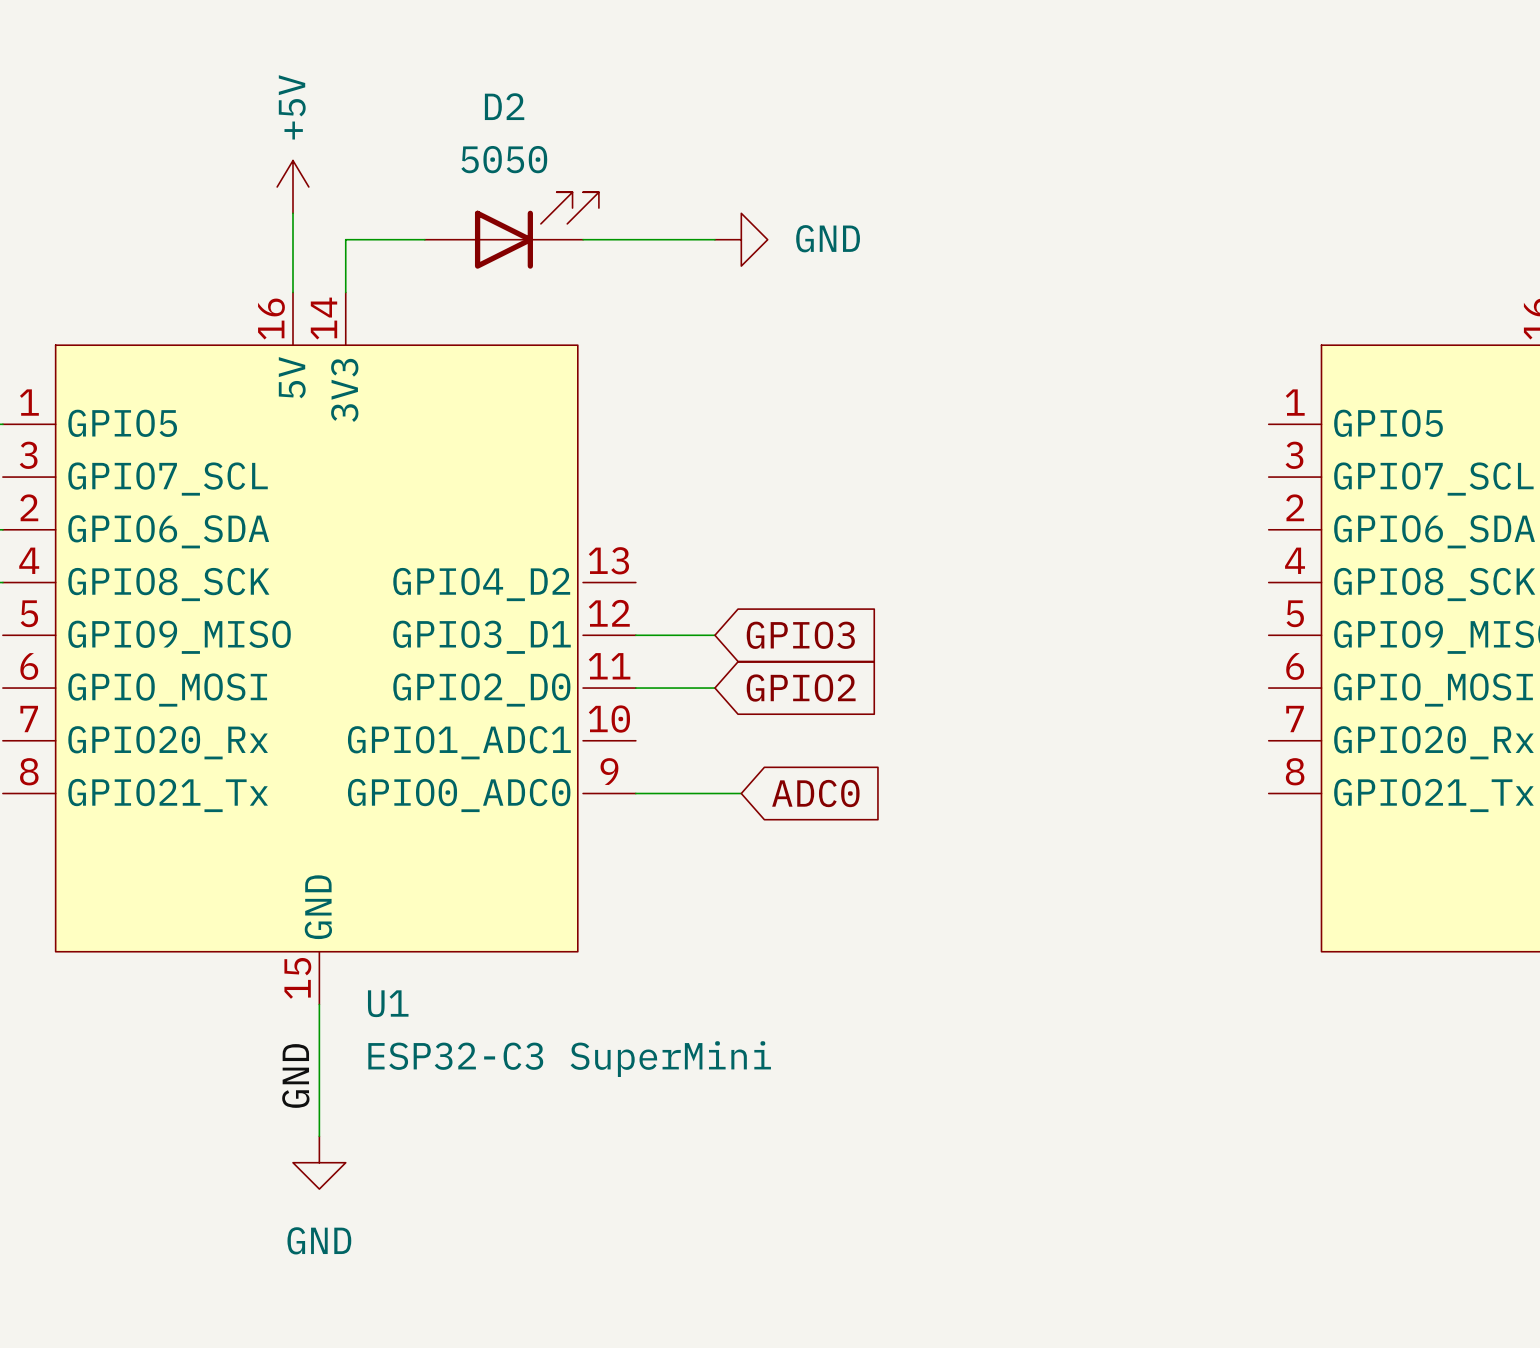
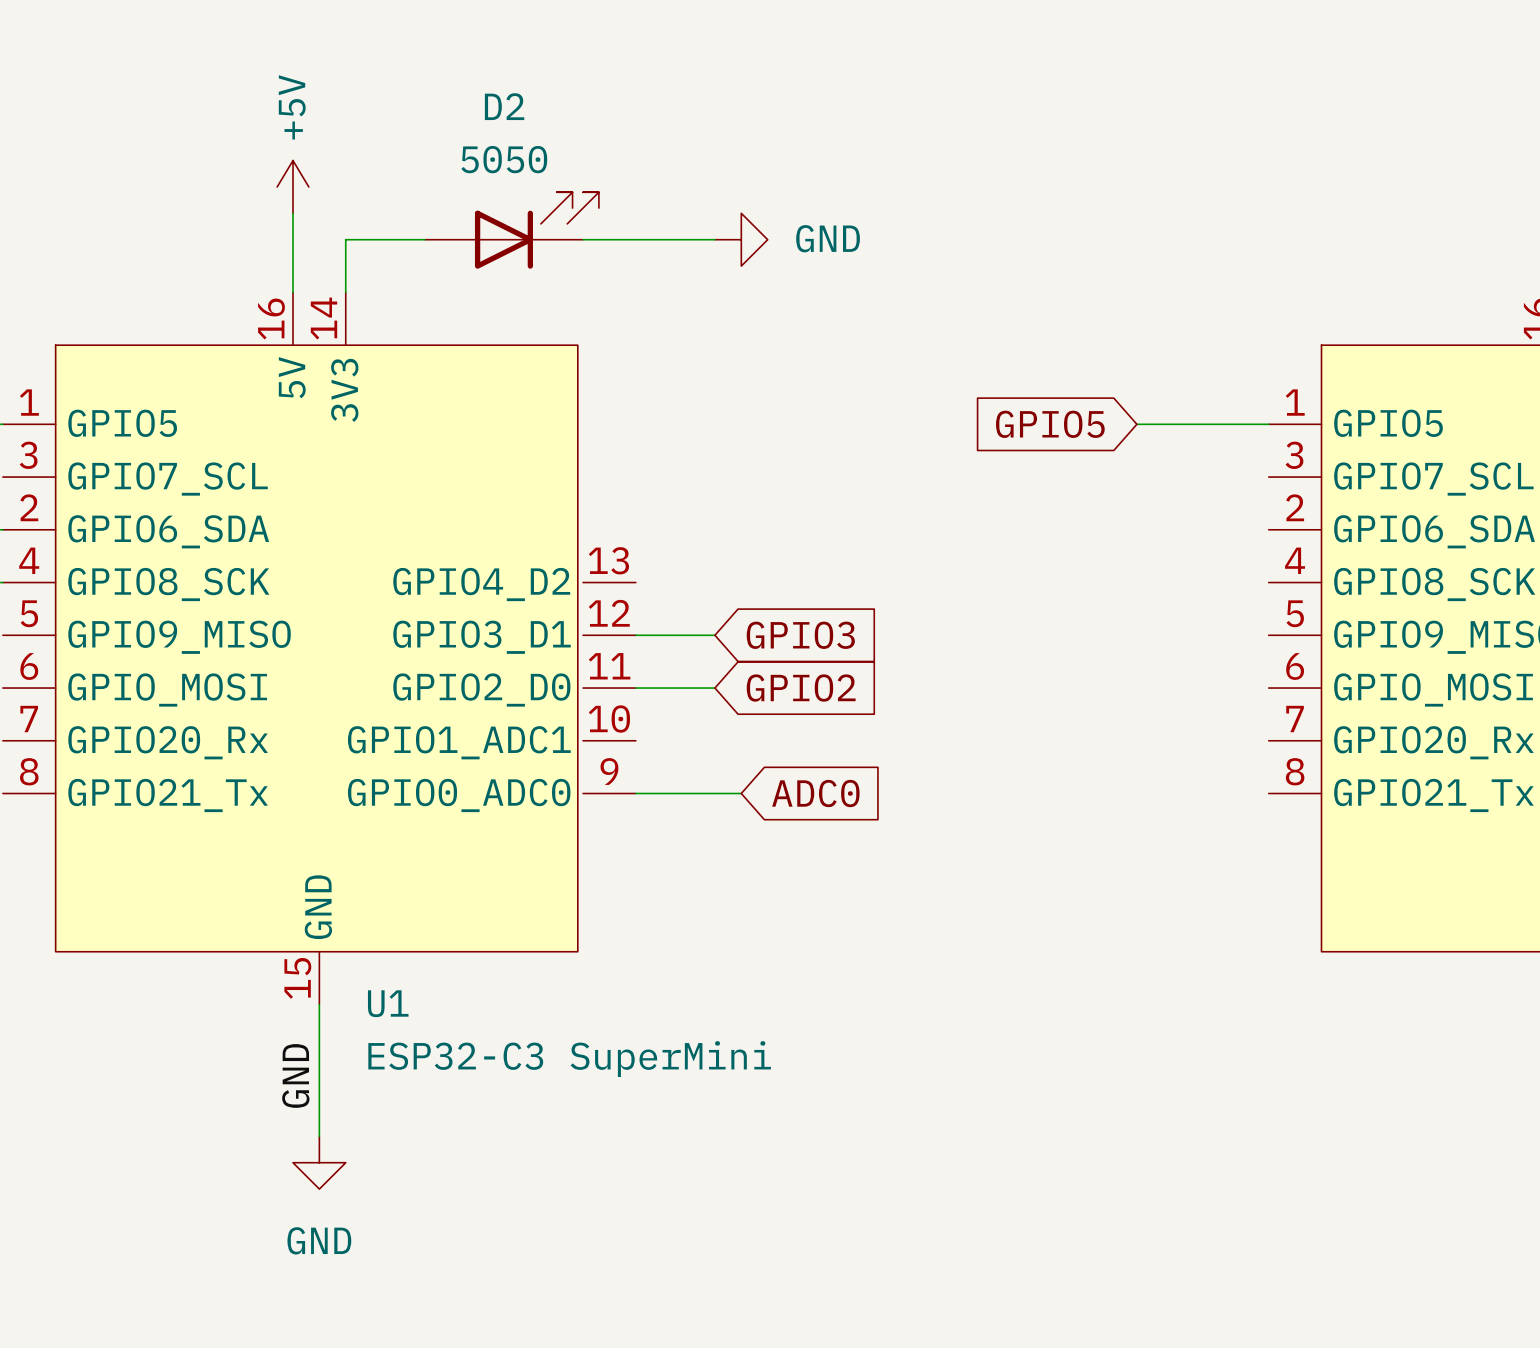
global label: none -> GPIO5 (1050, 424)
wire: none -> (1136, 424) (1268, 424)

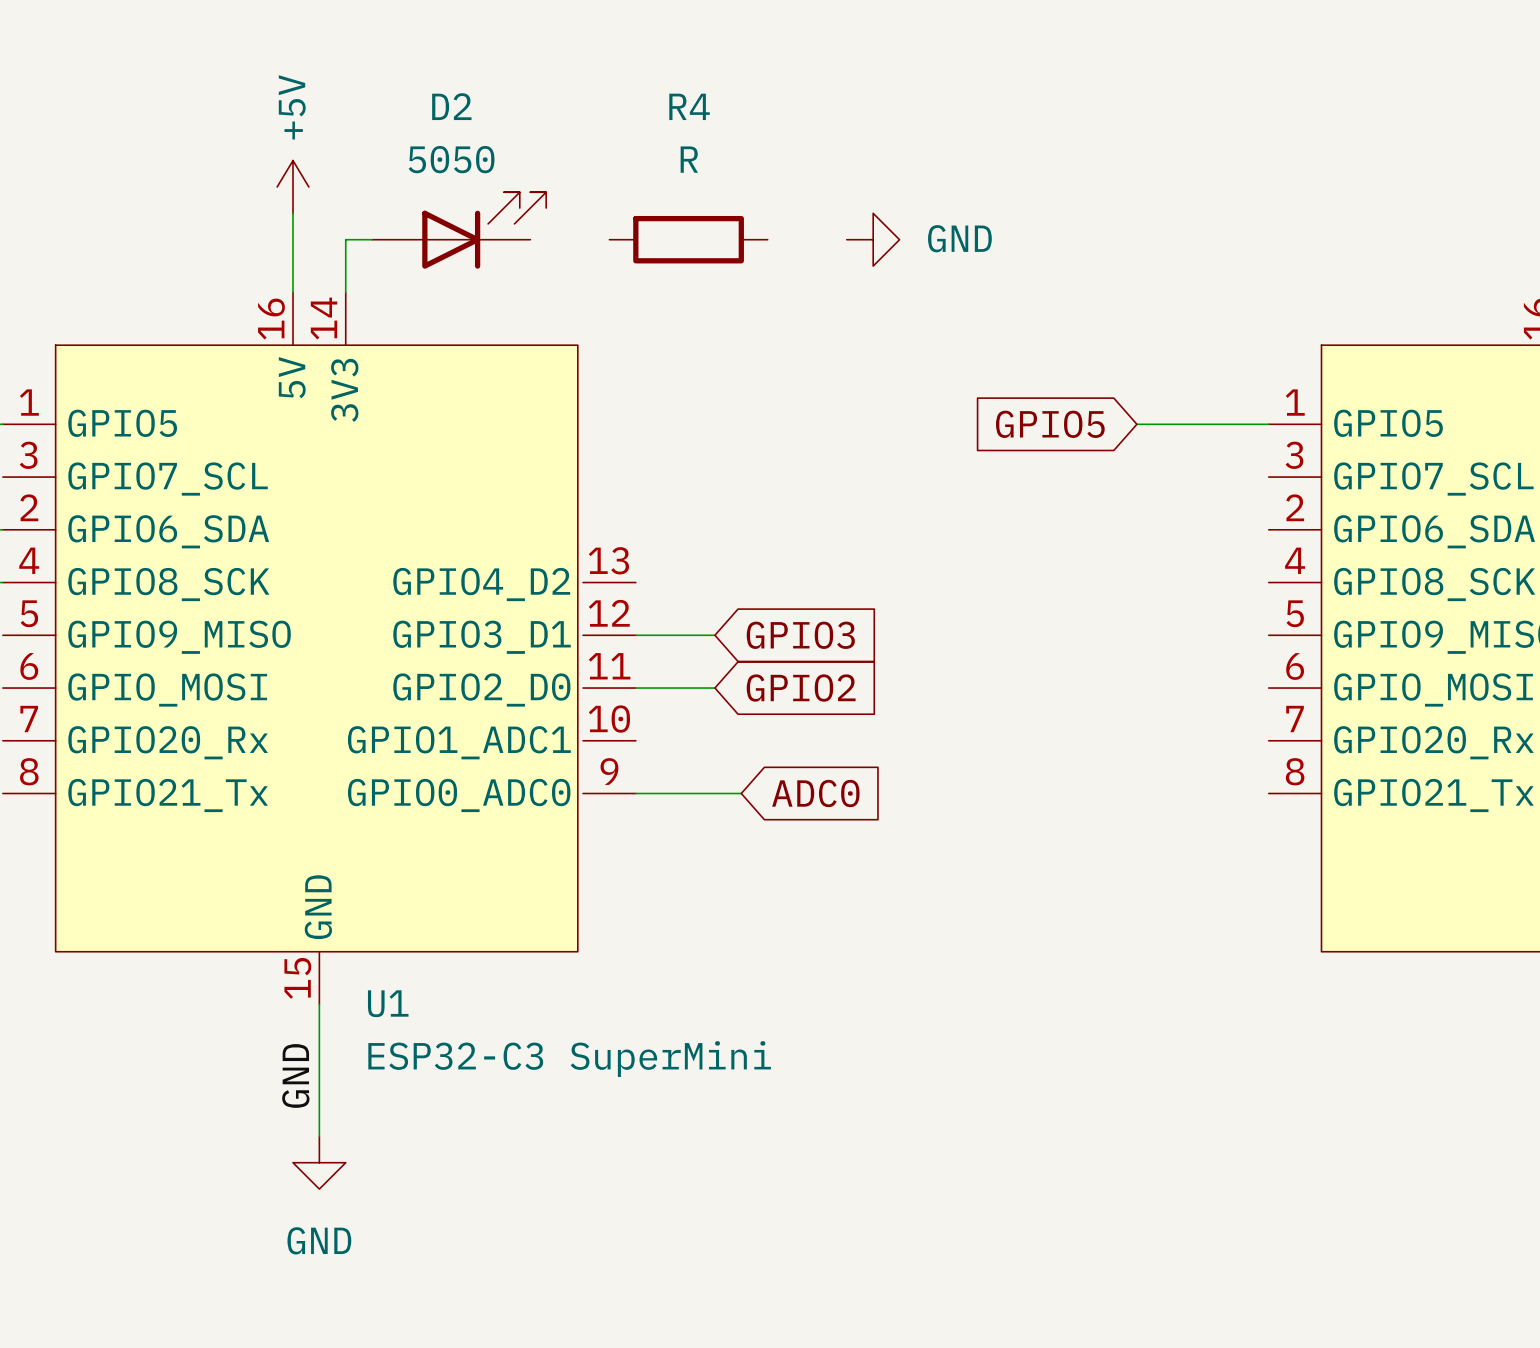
D2 position: (511, 230) -> (459, 230)
wire: (583, 239) (714, 239) -> none
R4: none -> R (688, 239)
power symbol position: GND (741, 239) -> GND (873, 239)

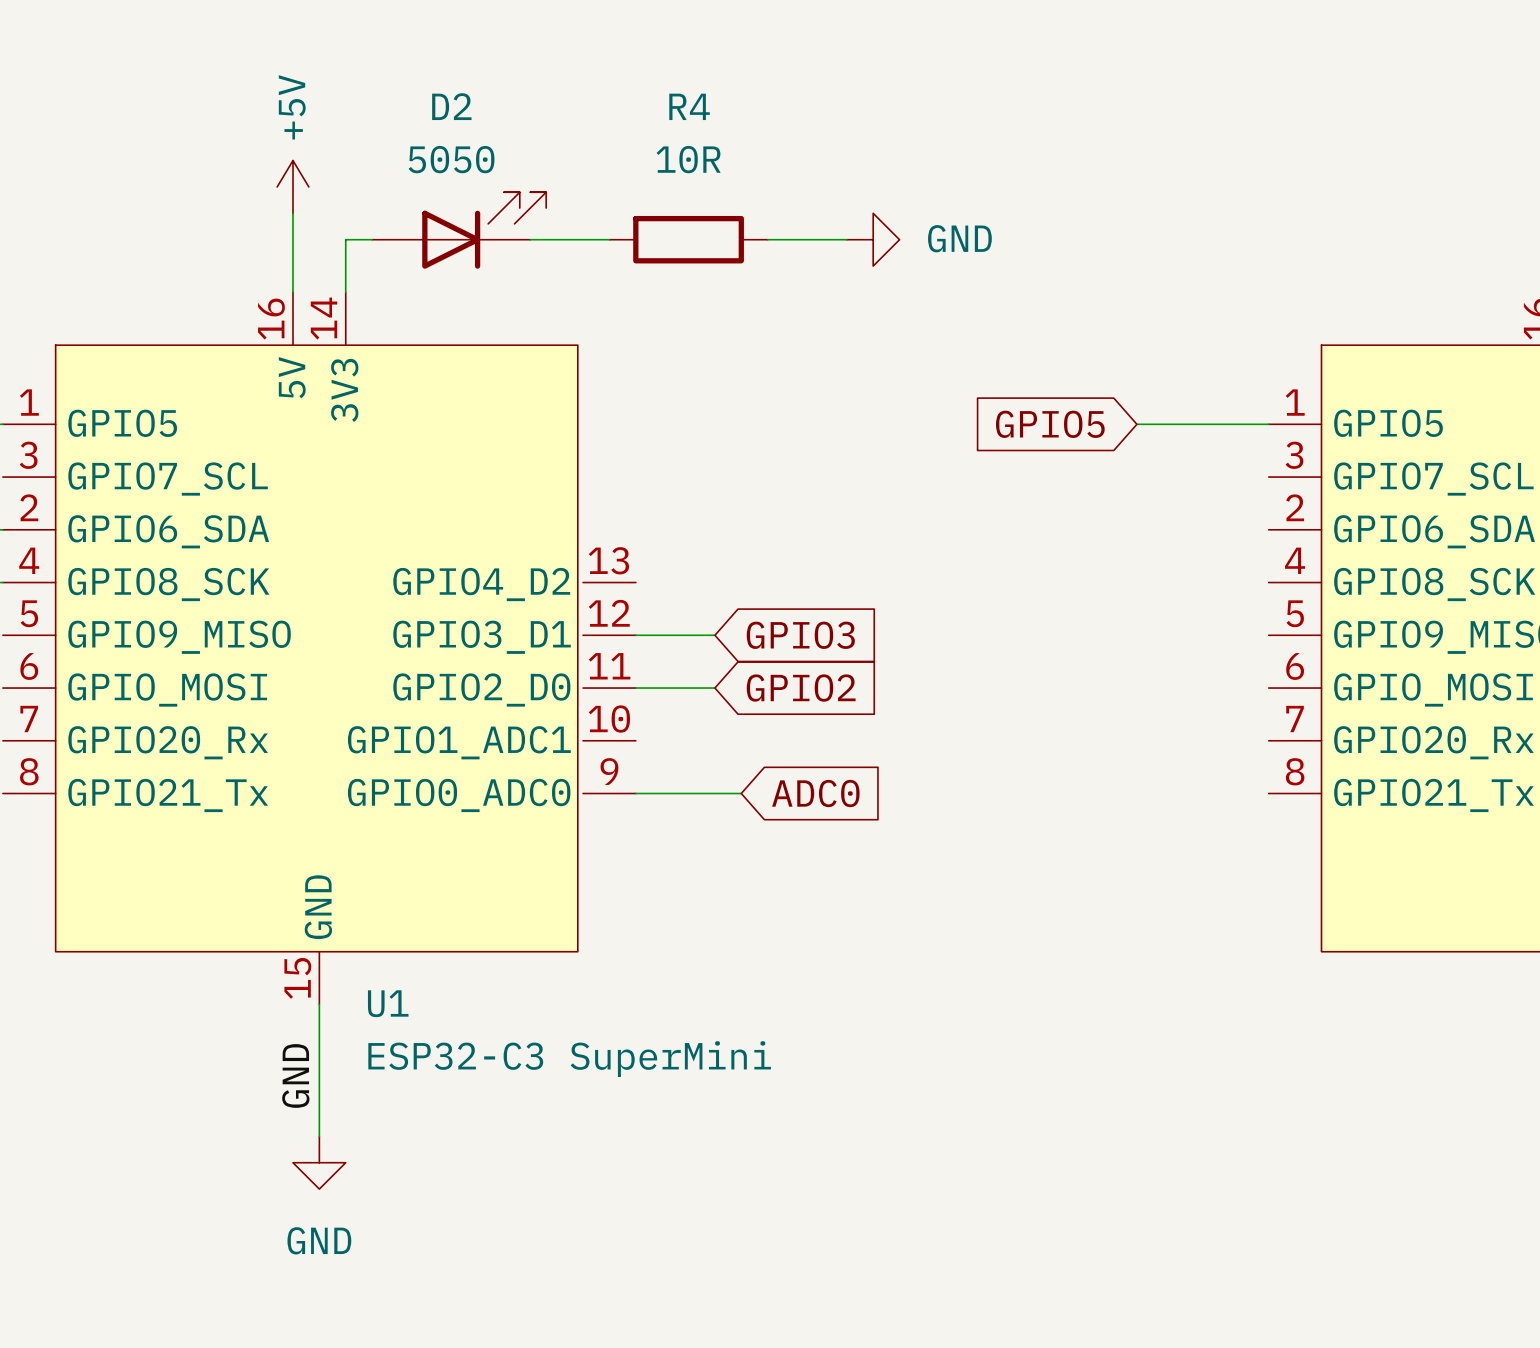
R4 value: R (689, 159) -> 10R (688, 159)
wire: none -> (530, 239) (609, 239)
wire: none -> (767, 239) (846, 239)

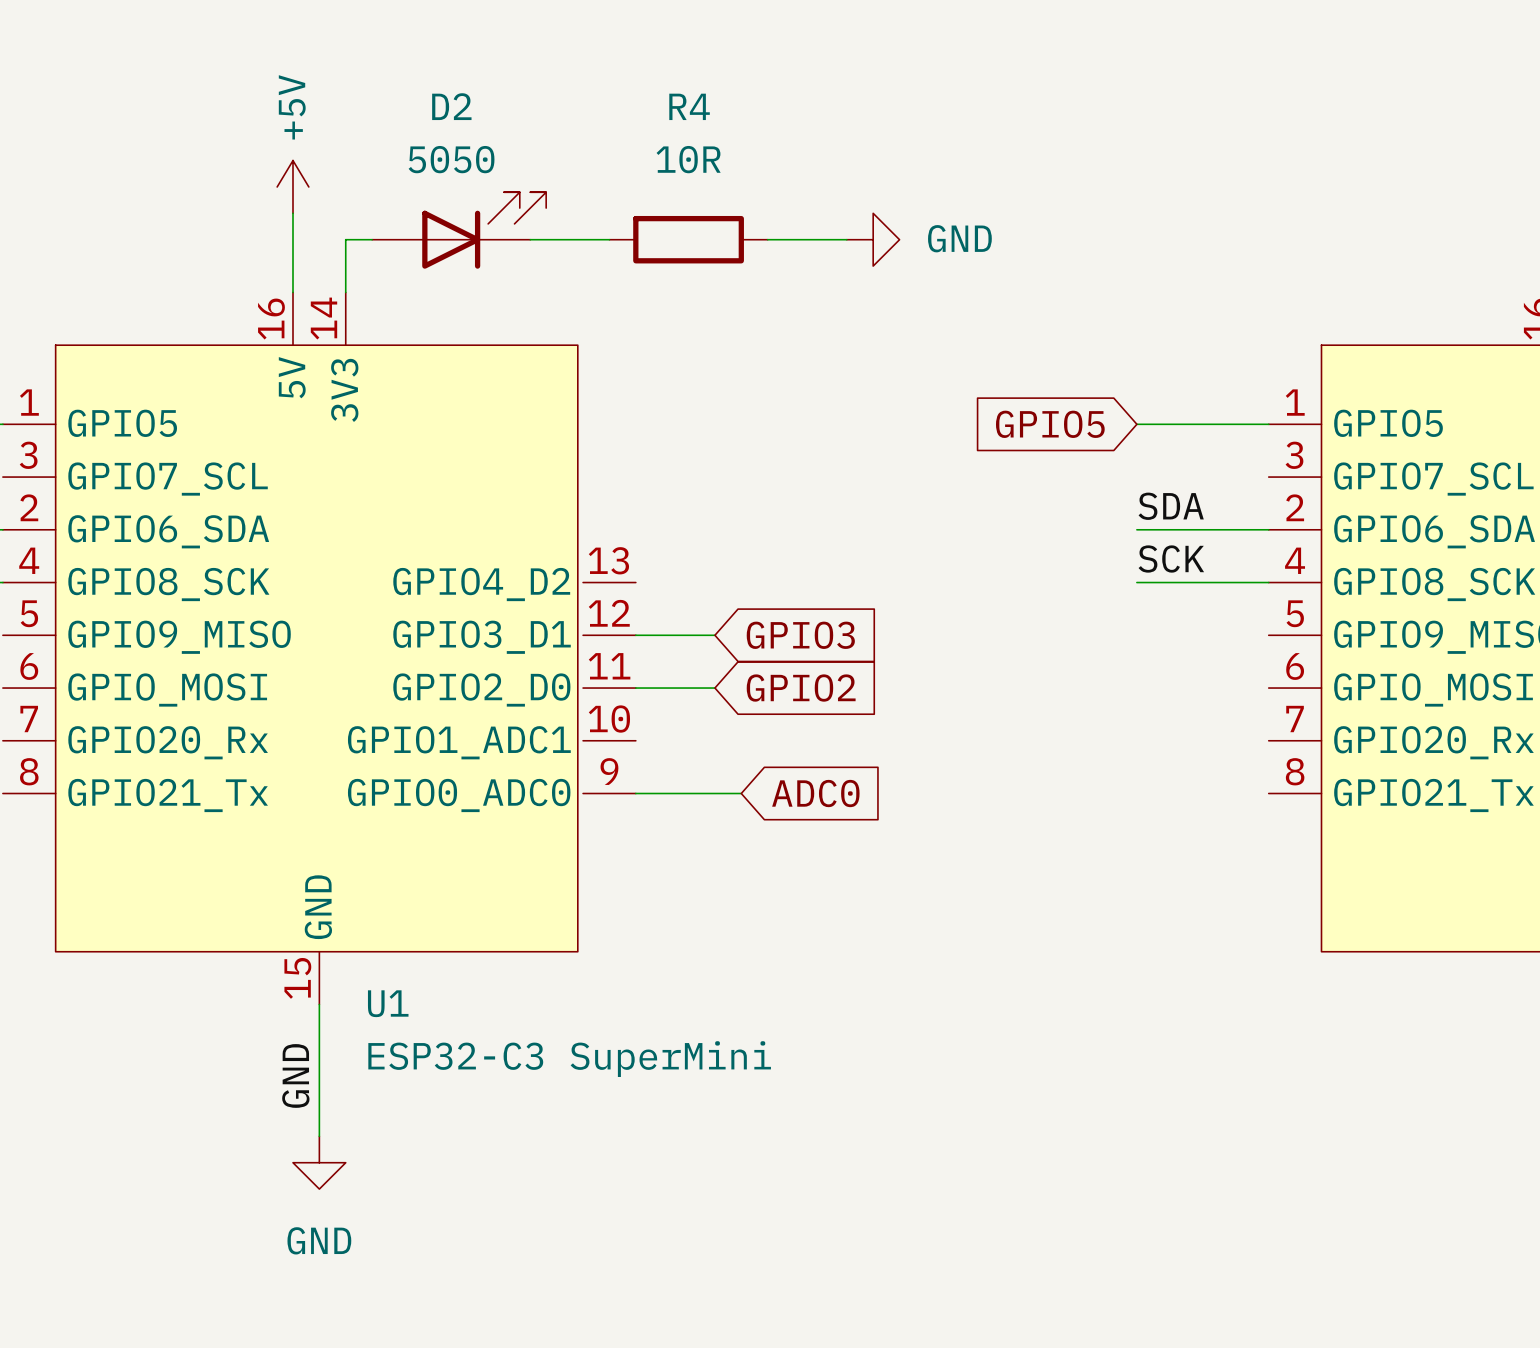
label: none -> SDA (1171, 506)
wire: none -> (1136, 529) (1268, 529)
label: none -> SCK (1171, 559)
wire: none -> (1136, 582) (1268, 582)

